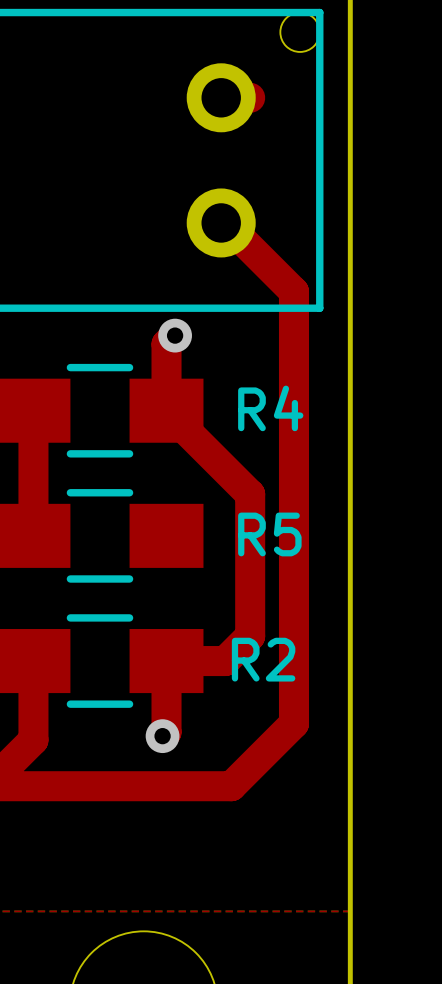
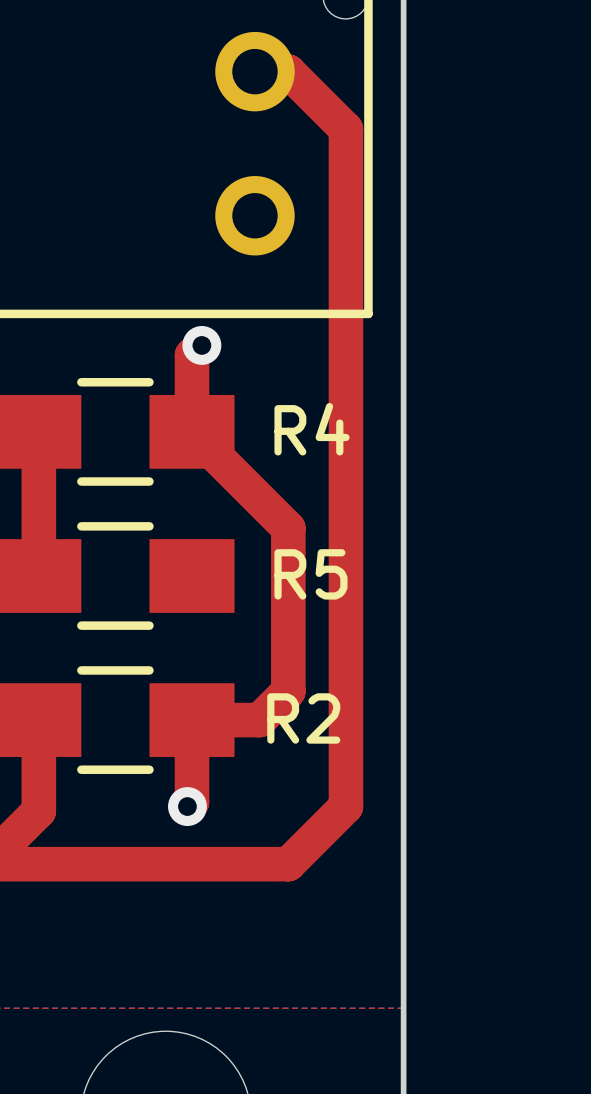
top track: (221, 222) (225, 222) (294, 291) (294, 723) (231, 786) -> (288, 71) (345, 129) (345, 806) (288, 864) (266, 864)

